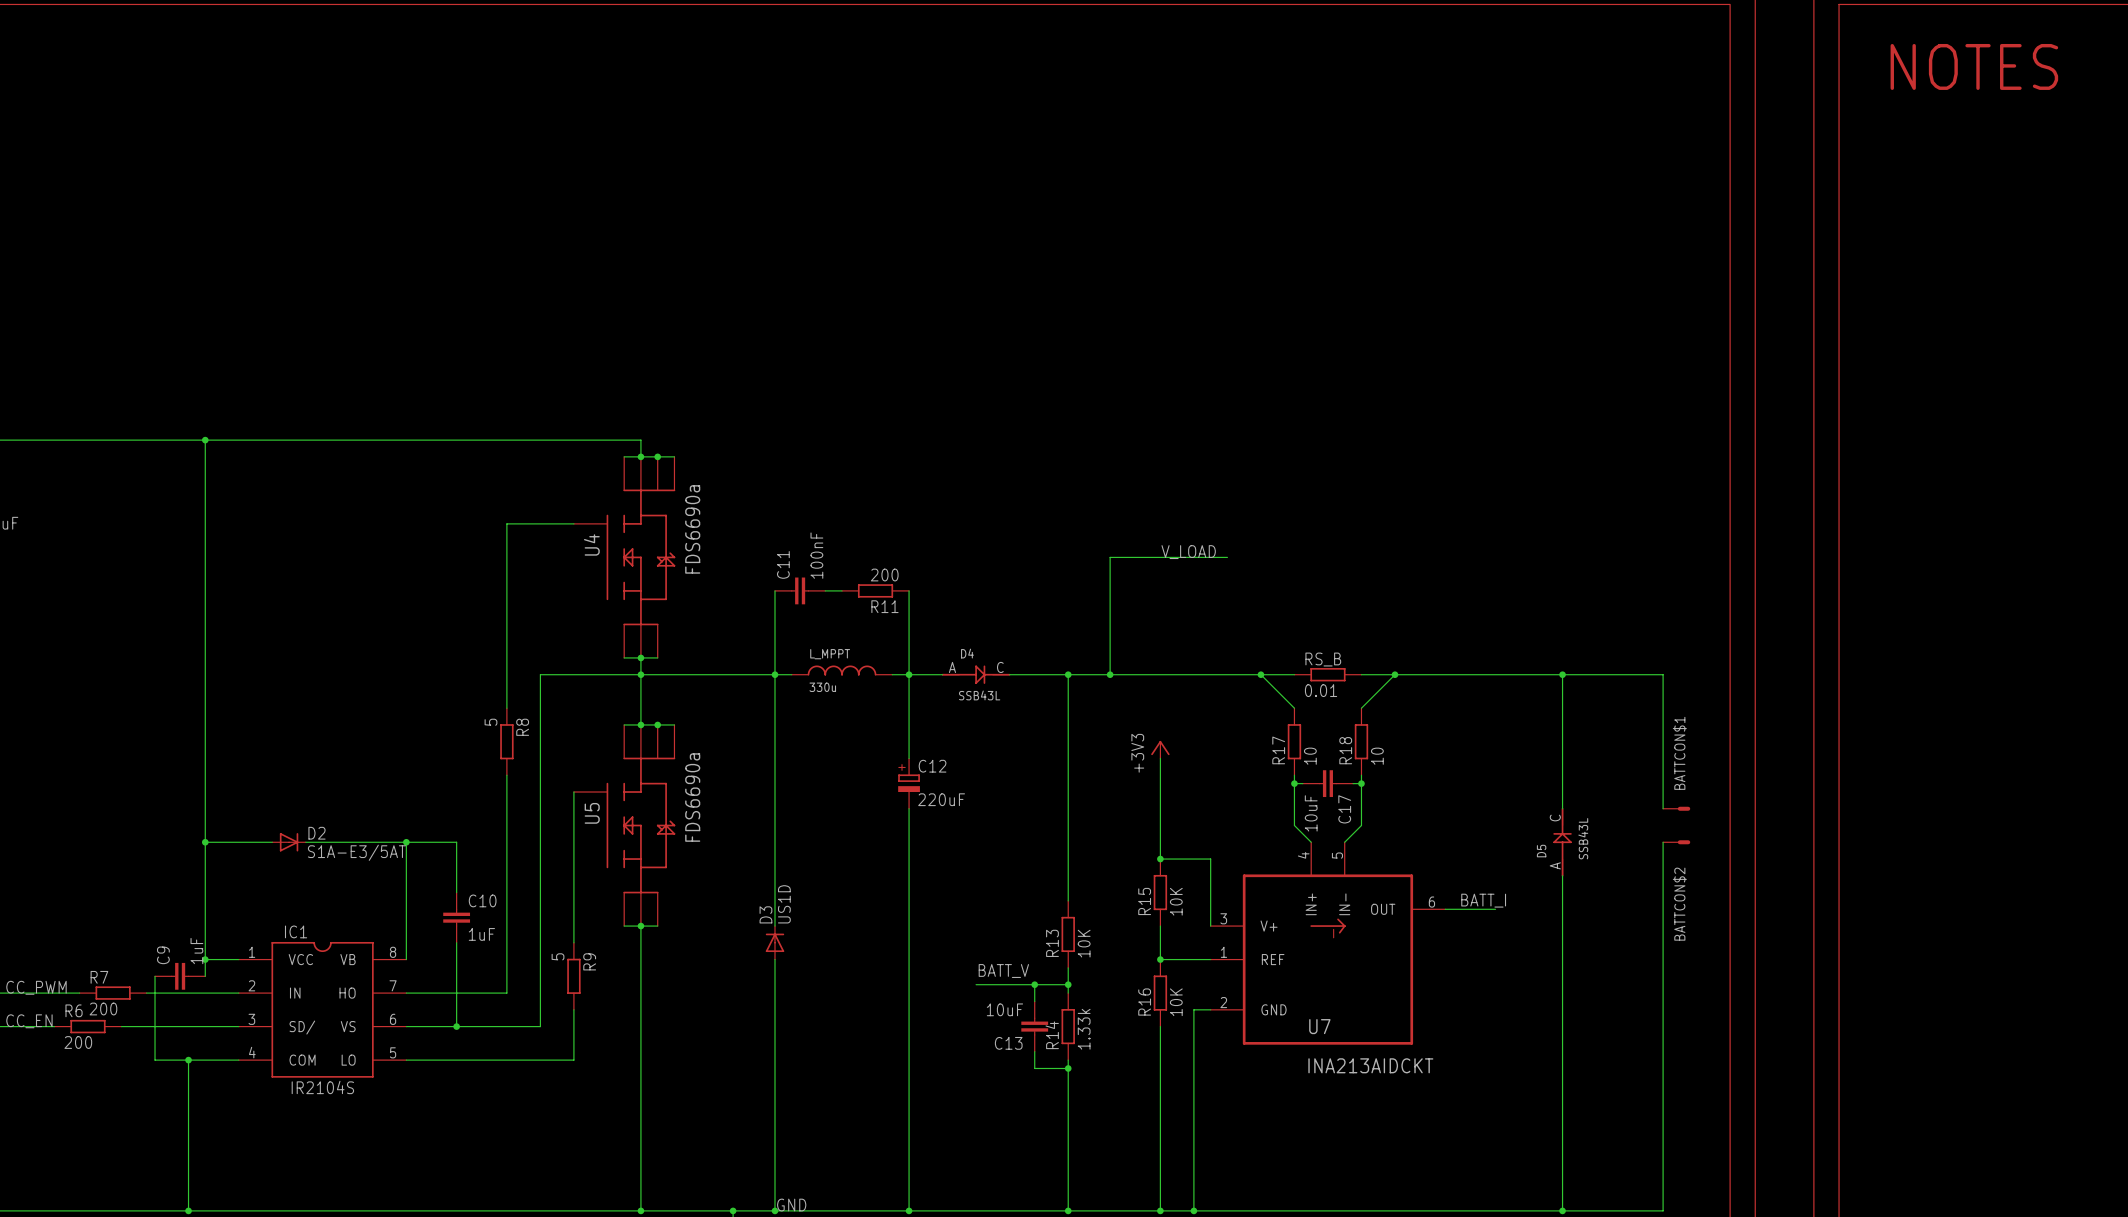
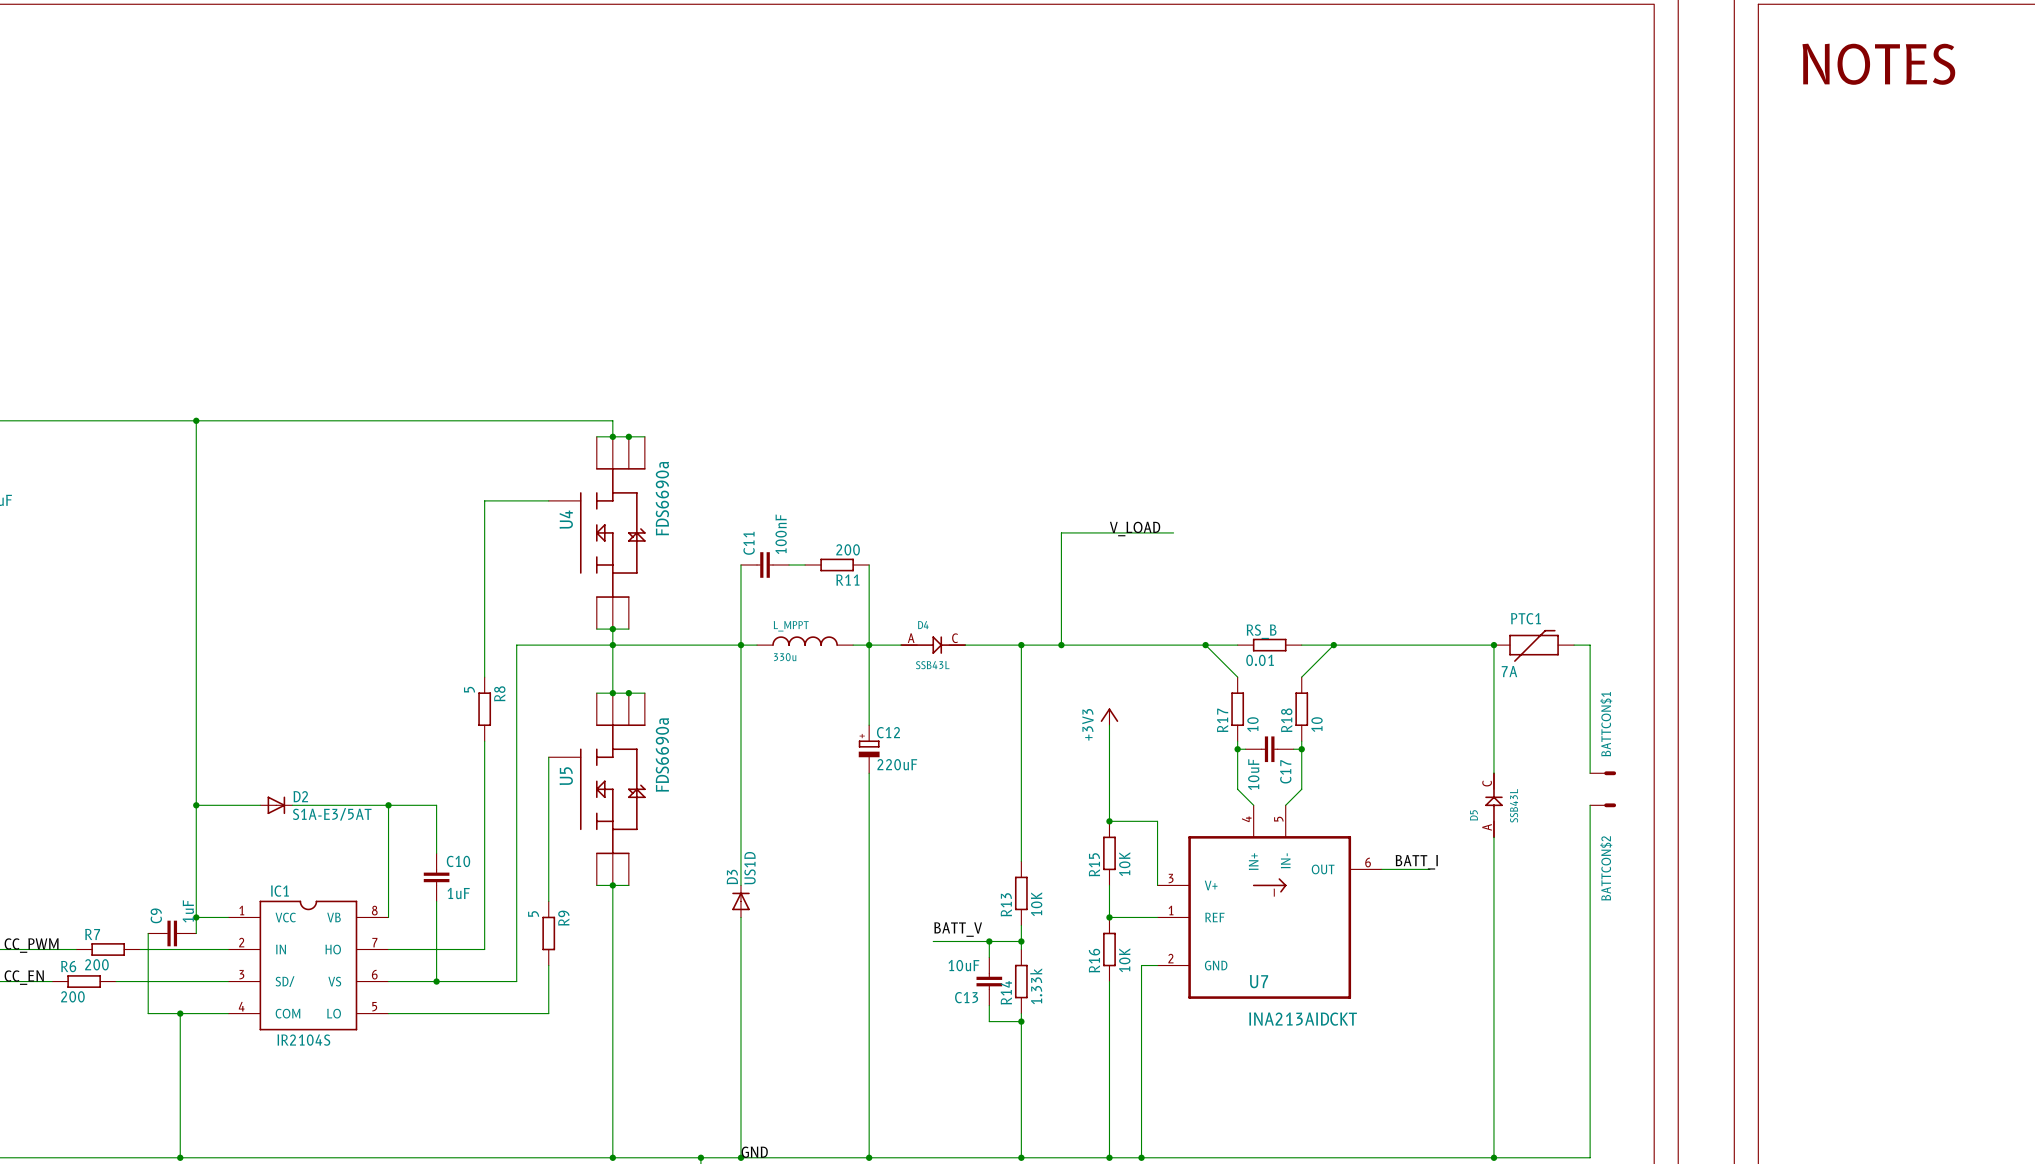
wire: (1562, 674) (1646, 674) -> none
PTC1: none -> 7A (1534, 645)

